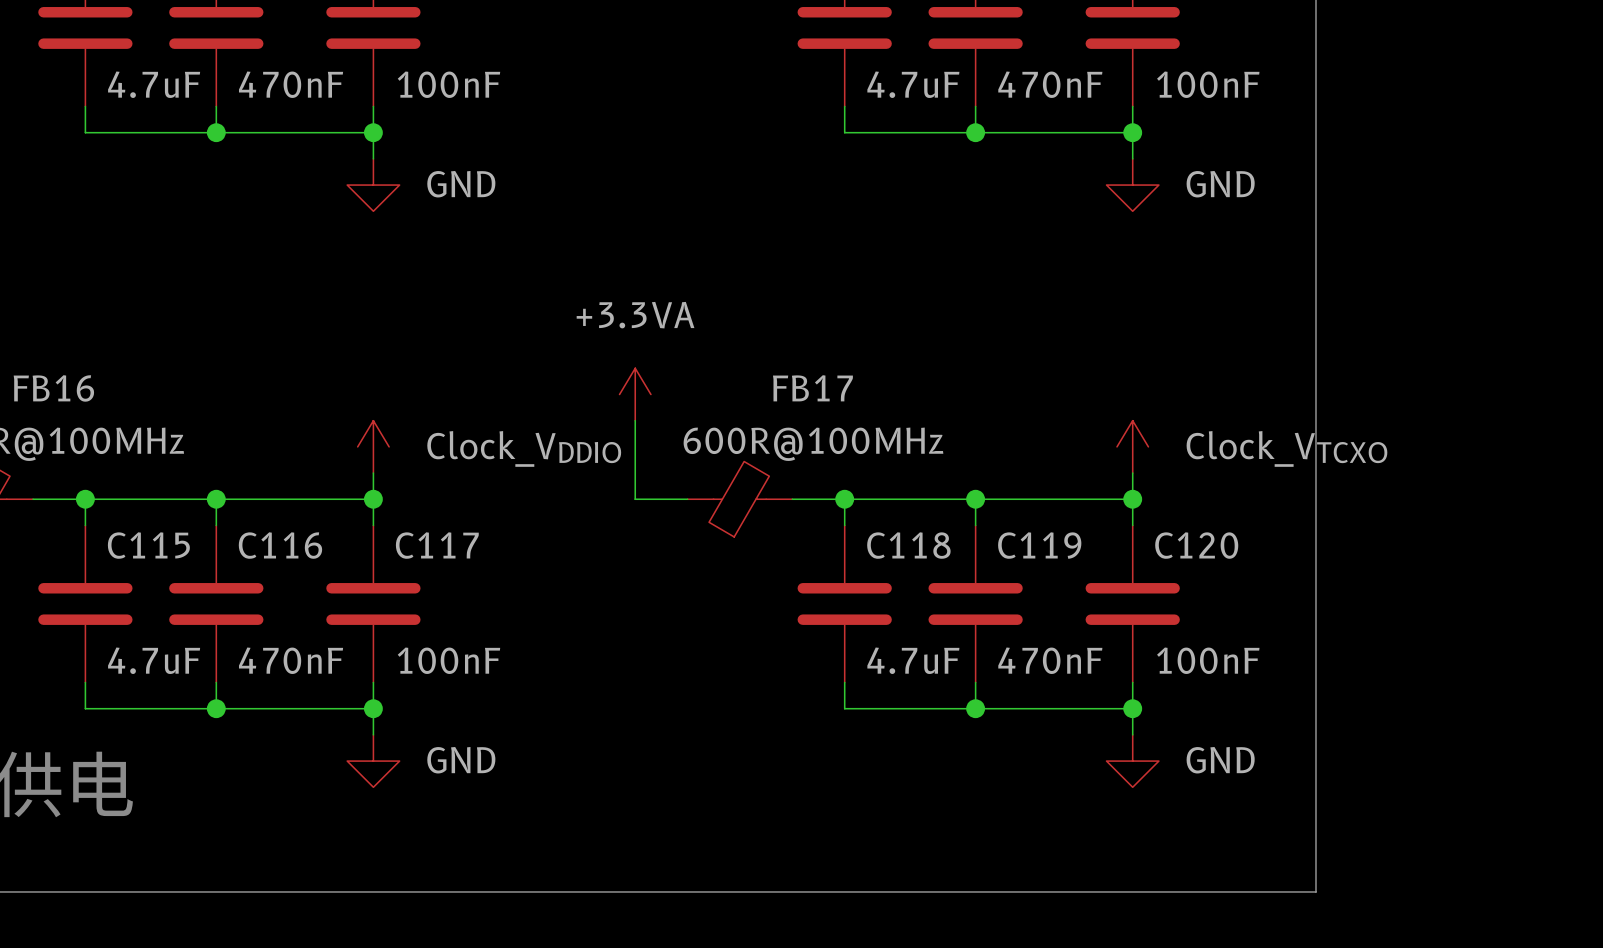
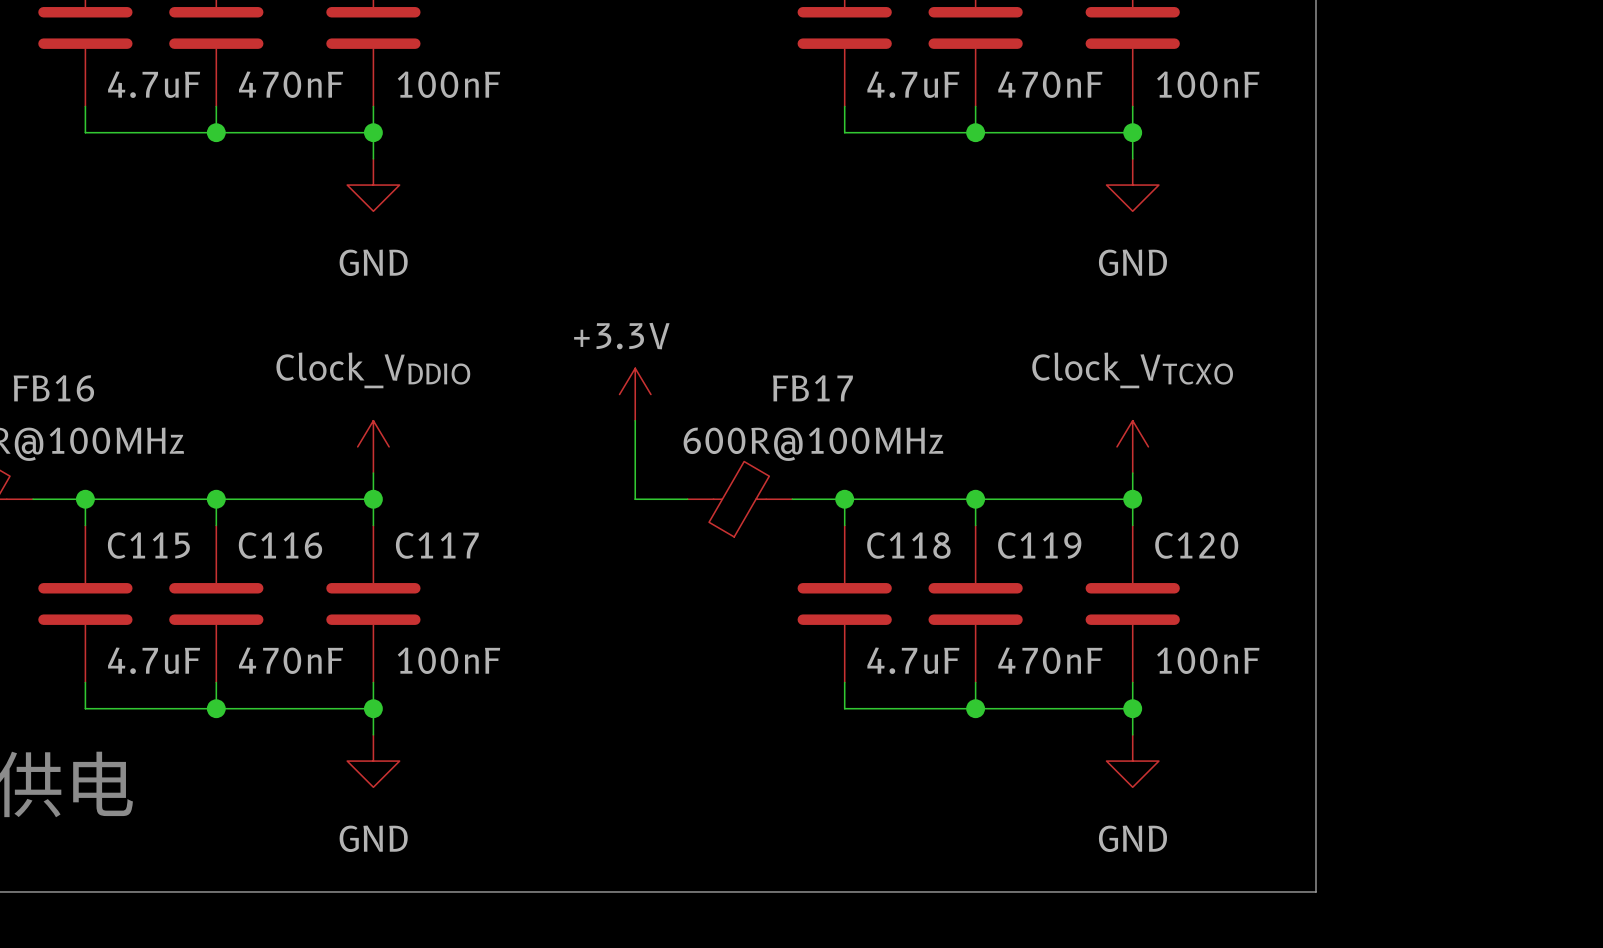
power symbol text position: GND (461, 184) -> GND (373, 262)
power symbol text position: GND (1220, 184) -> GND (1132, 262)
power symbol: +3.3VA (635, 394) -> +3.3V (635, 394)
power symbol text position: Clock_VDDIO (524, 448) -> Clock_VDDIO (373, 370)
power symbol text position: Clock_VTCXO (1286, 448) -> Clock_VTCXO (1132, 370)
power symbol text position: GND (461, 760) -> GND (373, 838)
power symbol text position: GND (1220, 760) -> GND (1132, 838)

